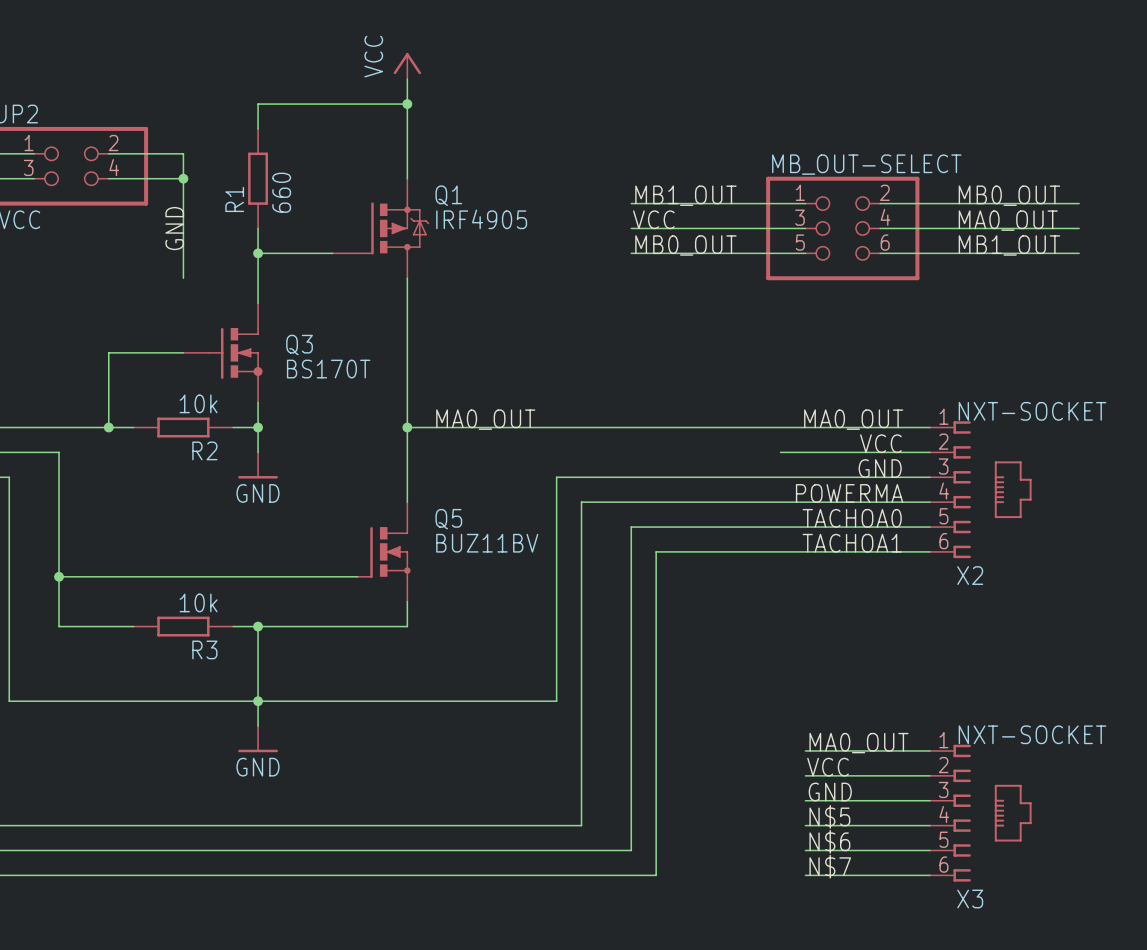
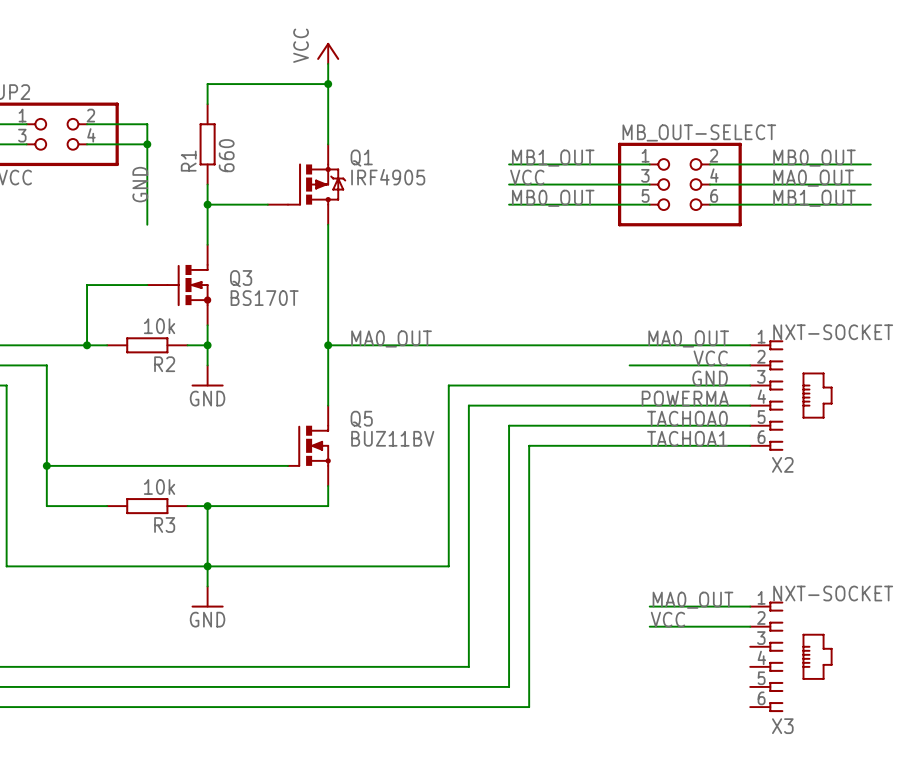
label: GND (830, 792) -> none
wire: (805, 800) (929, 800) -> none
label: N$5 (829, 816) -> none
wire: (805, 825) (929, 825) -> none
label: N$6 (829, 841) -> none
wire: (805, 850) (929, 850) -> none
label: N$7 (830, 866) -> none
wire: (805, 875) (929, 875) -> none

